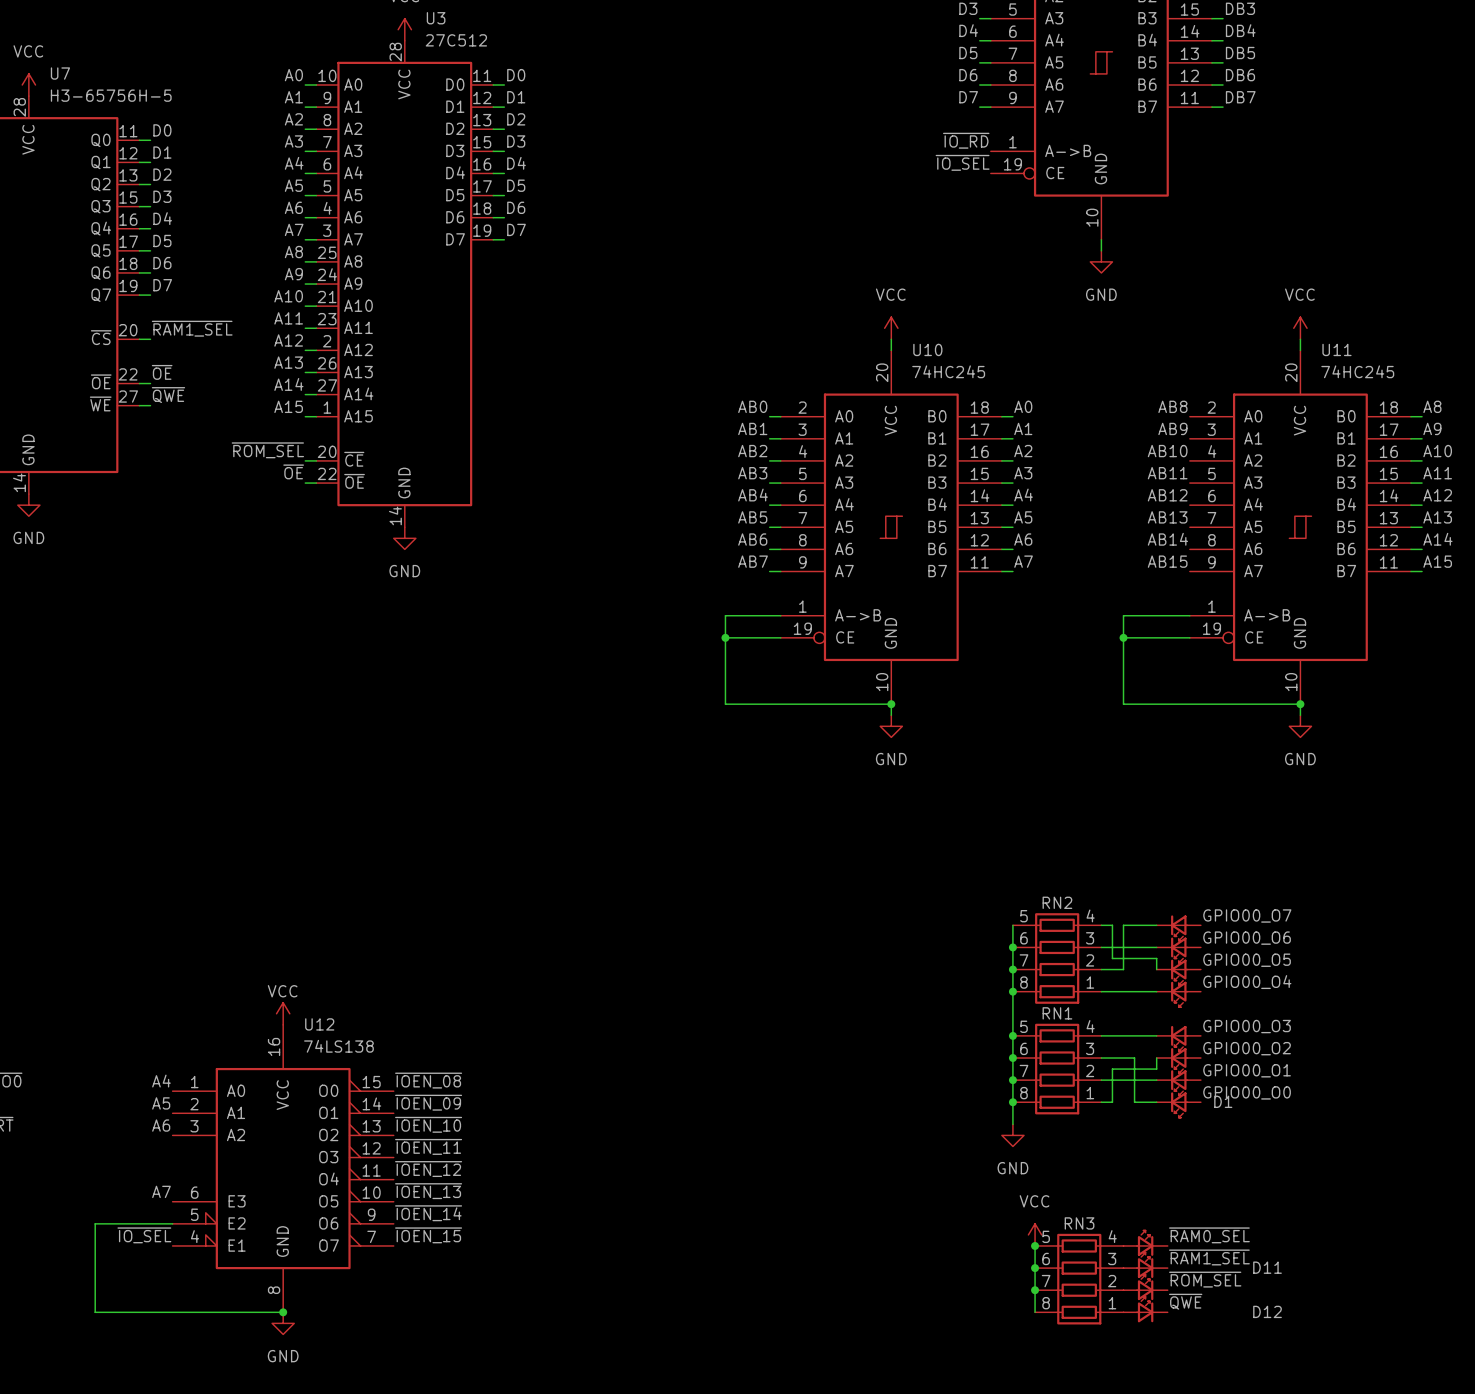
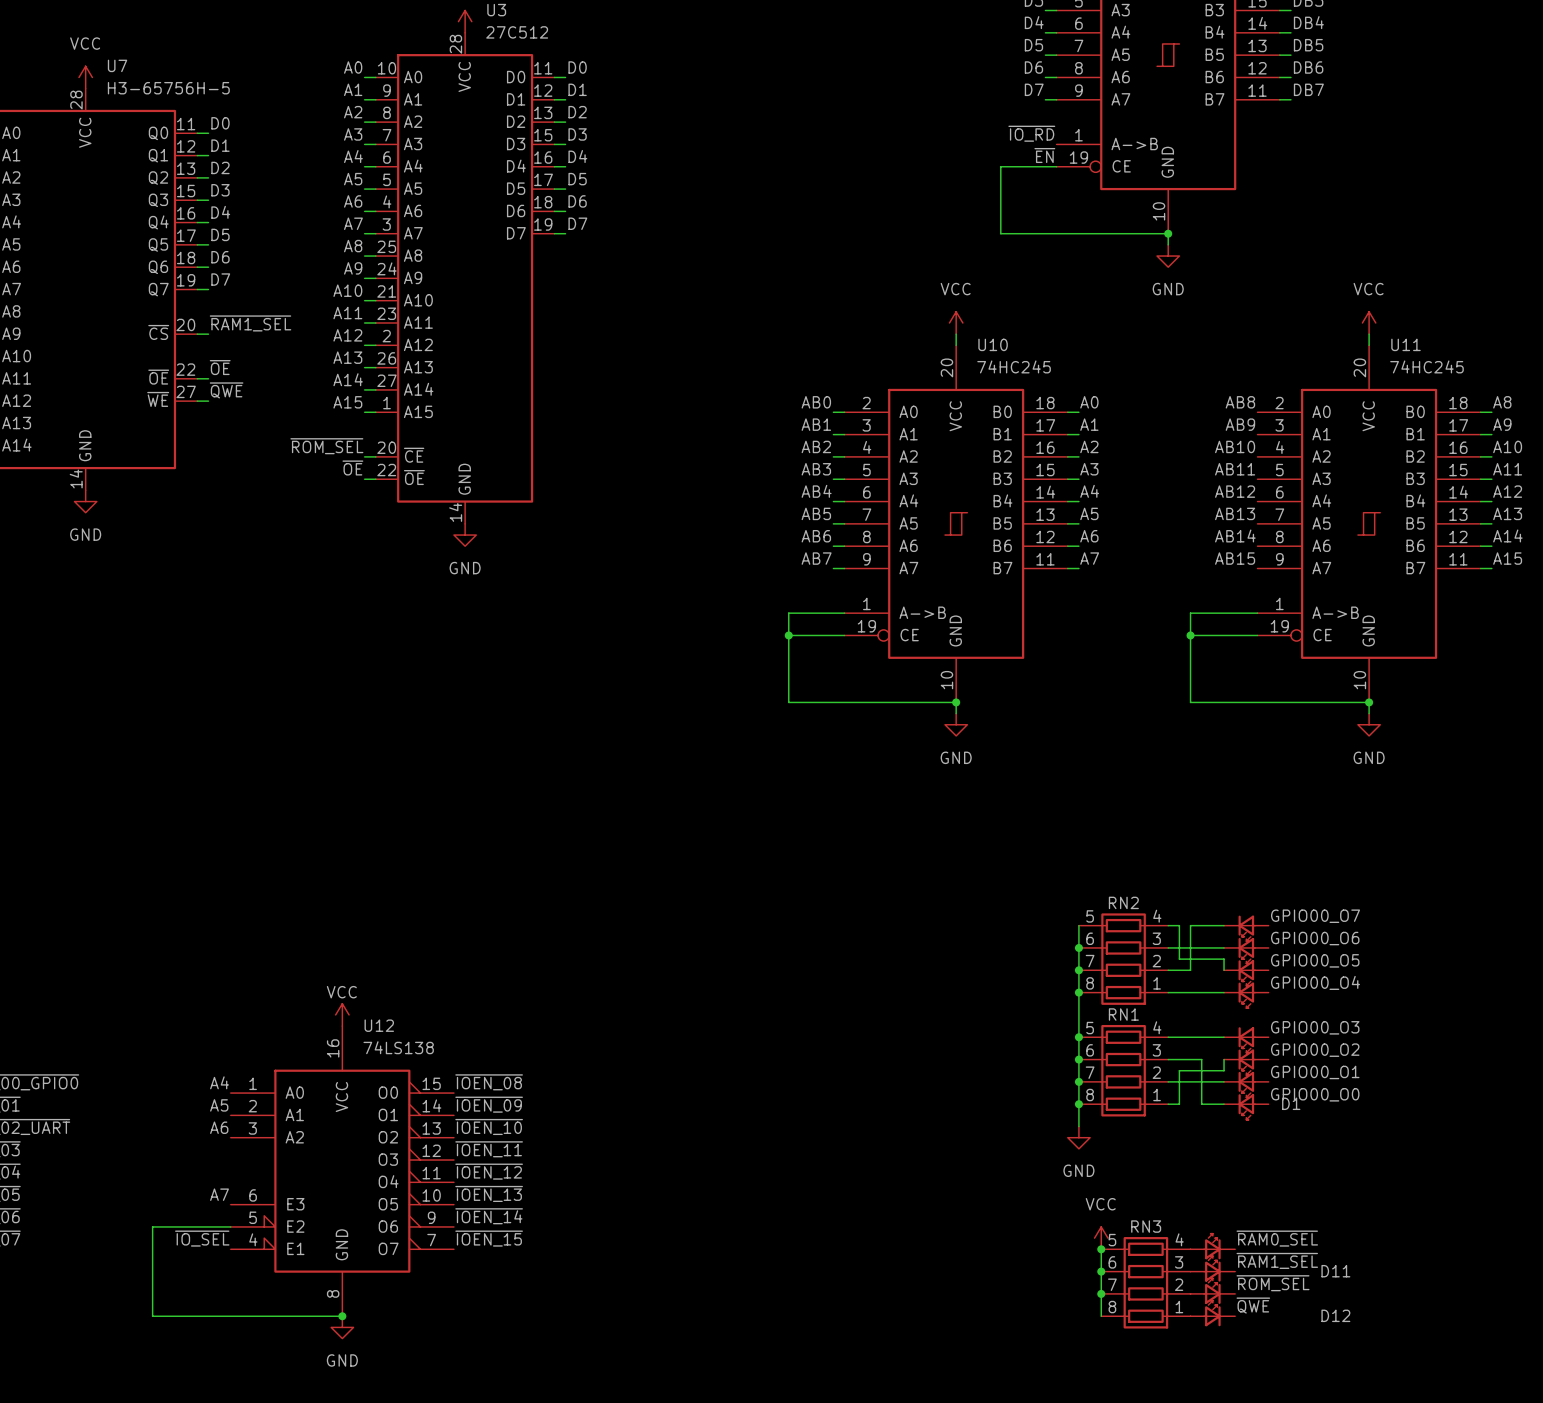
label: ~{IO_SEL} (962, 162) -> ~{EN} (1044, 155)
wire: none -> (1056, 166) (1000, 166) (1000, 233) (1168, 233)
junction: none -> (1168, 233)

